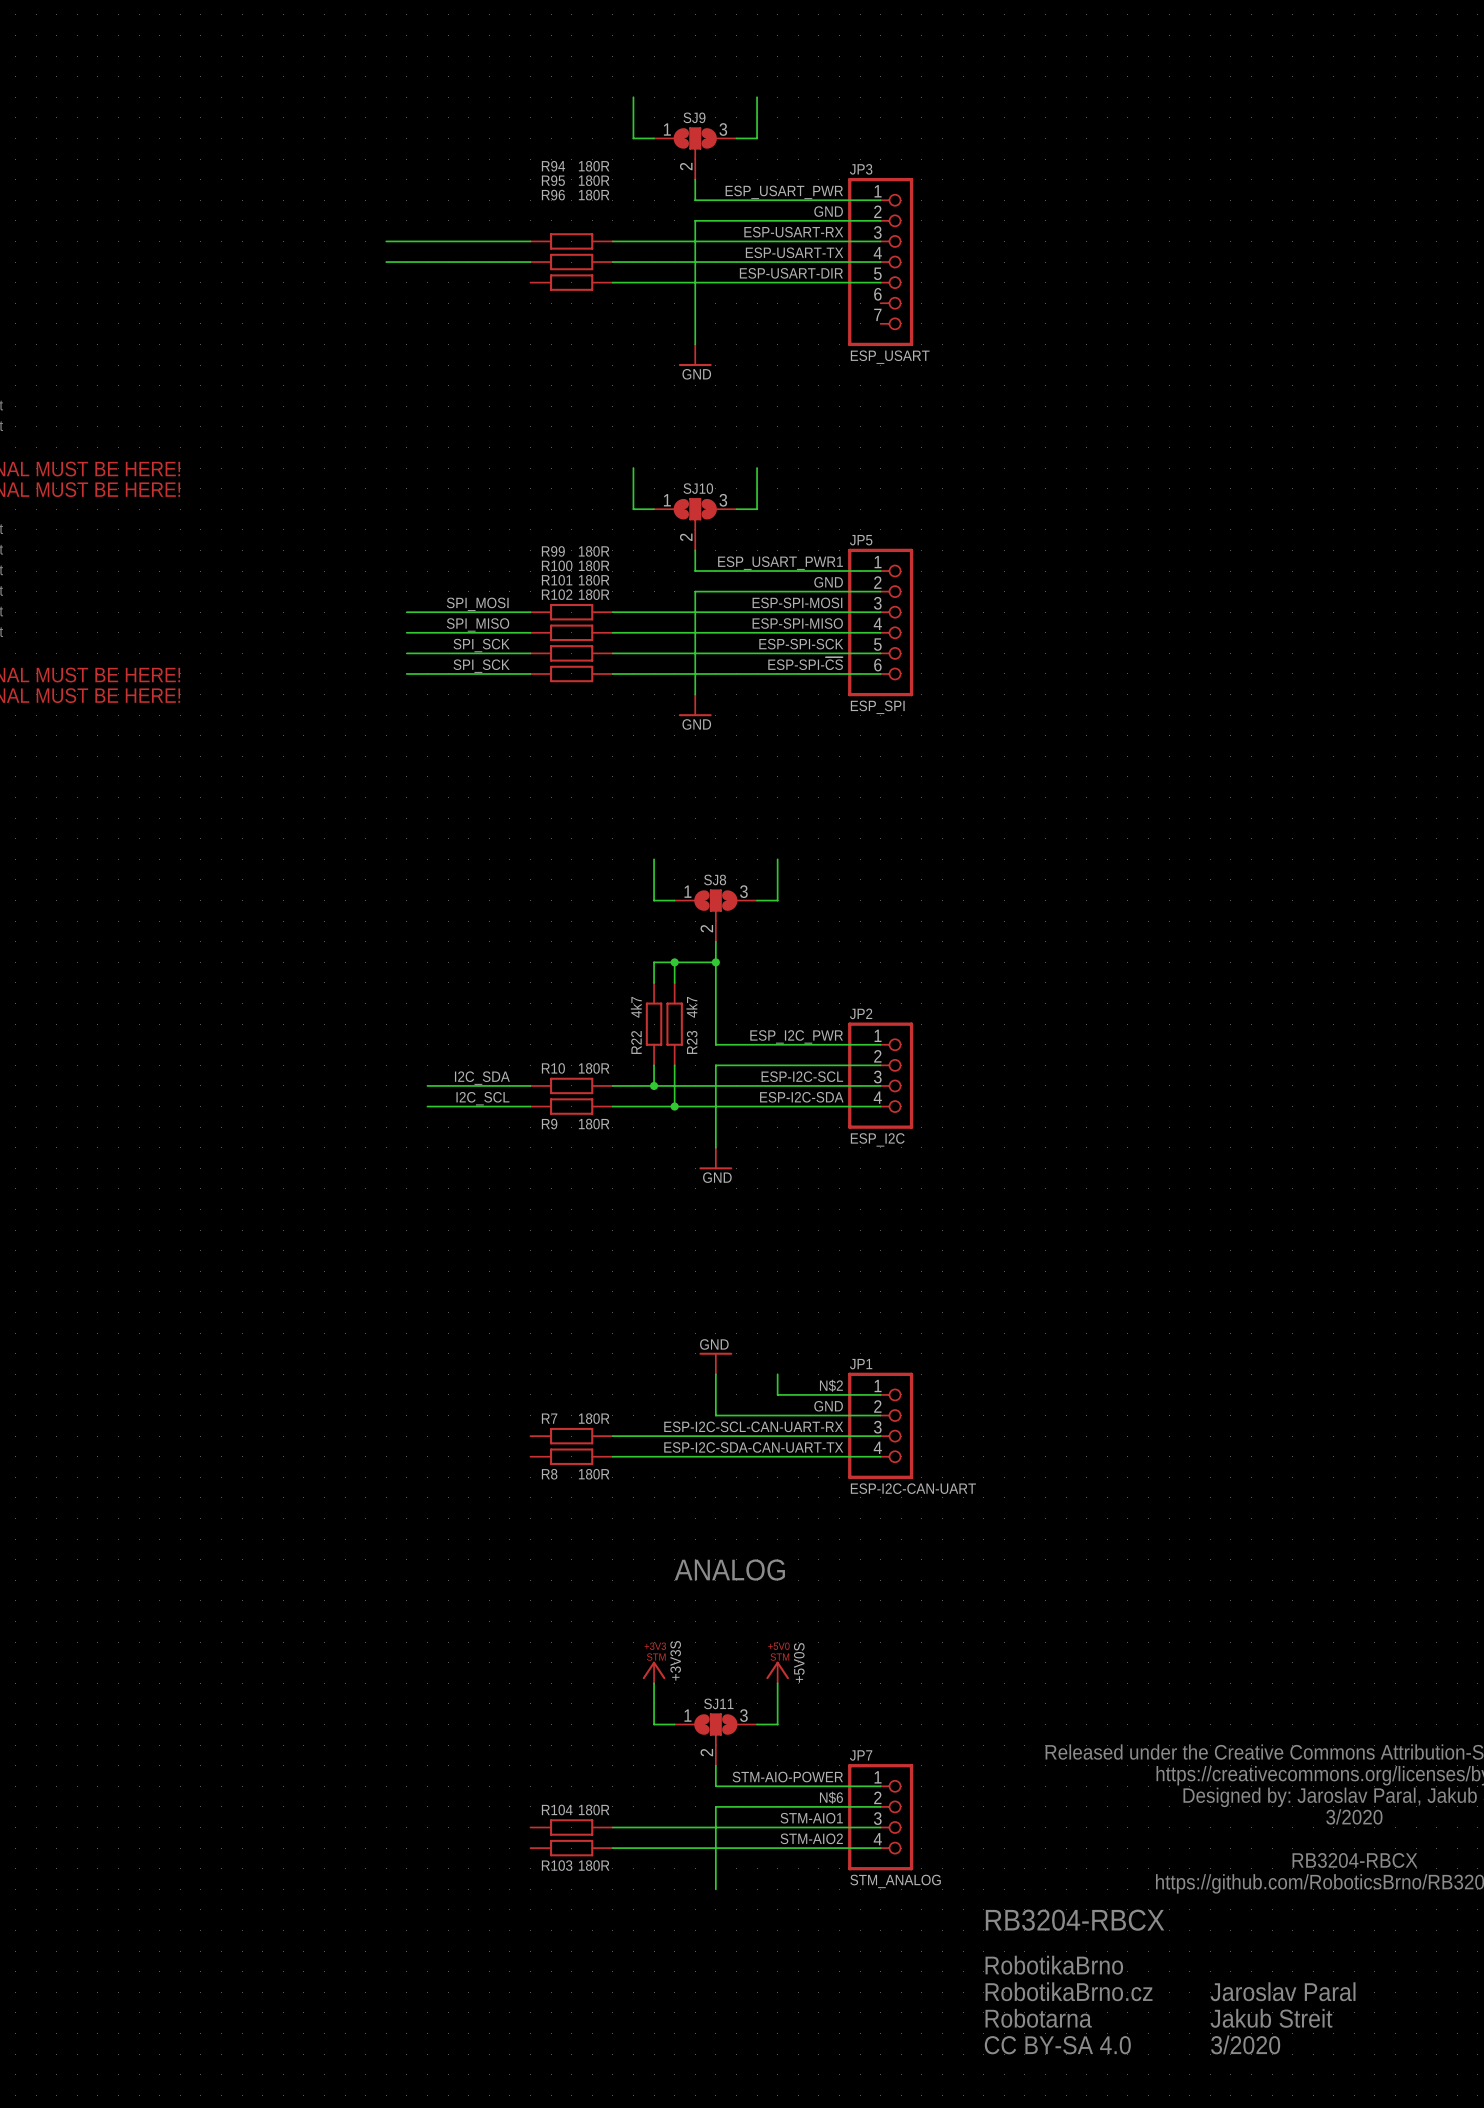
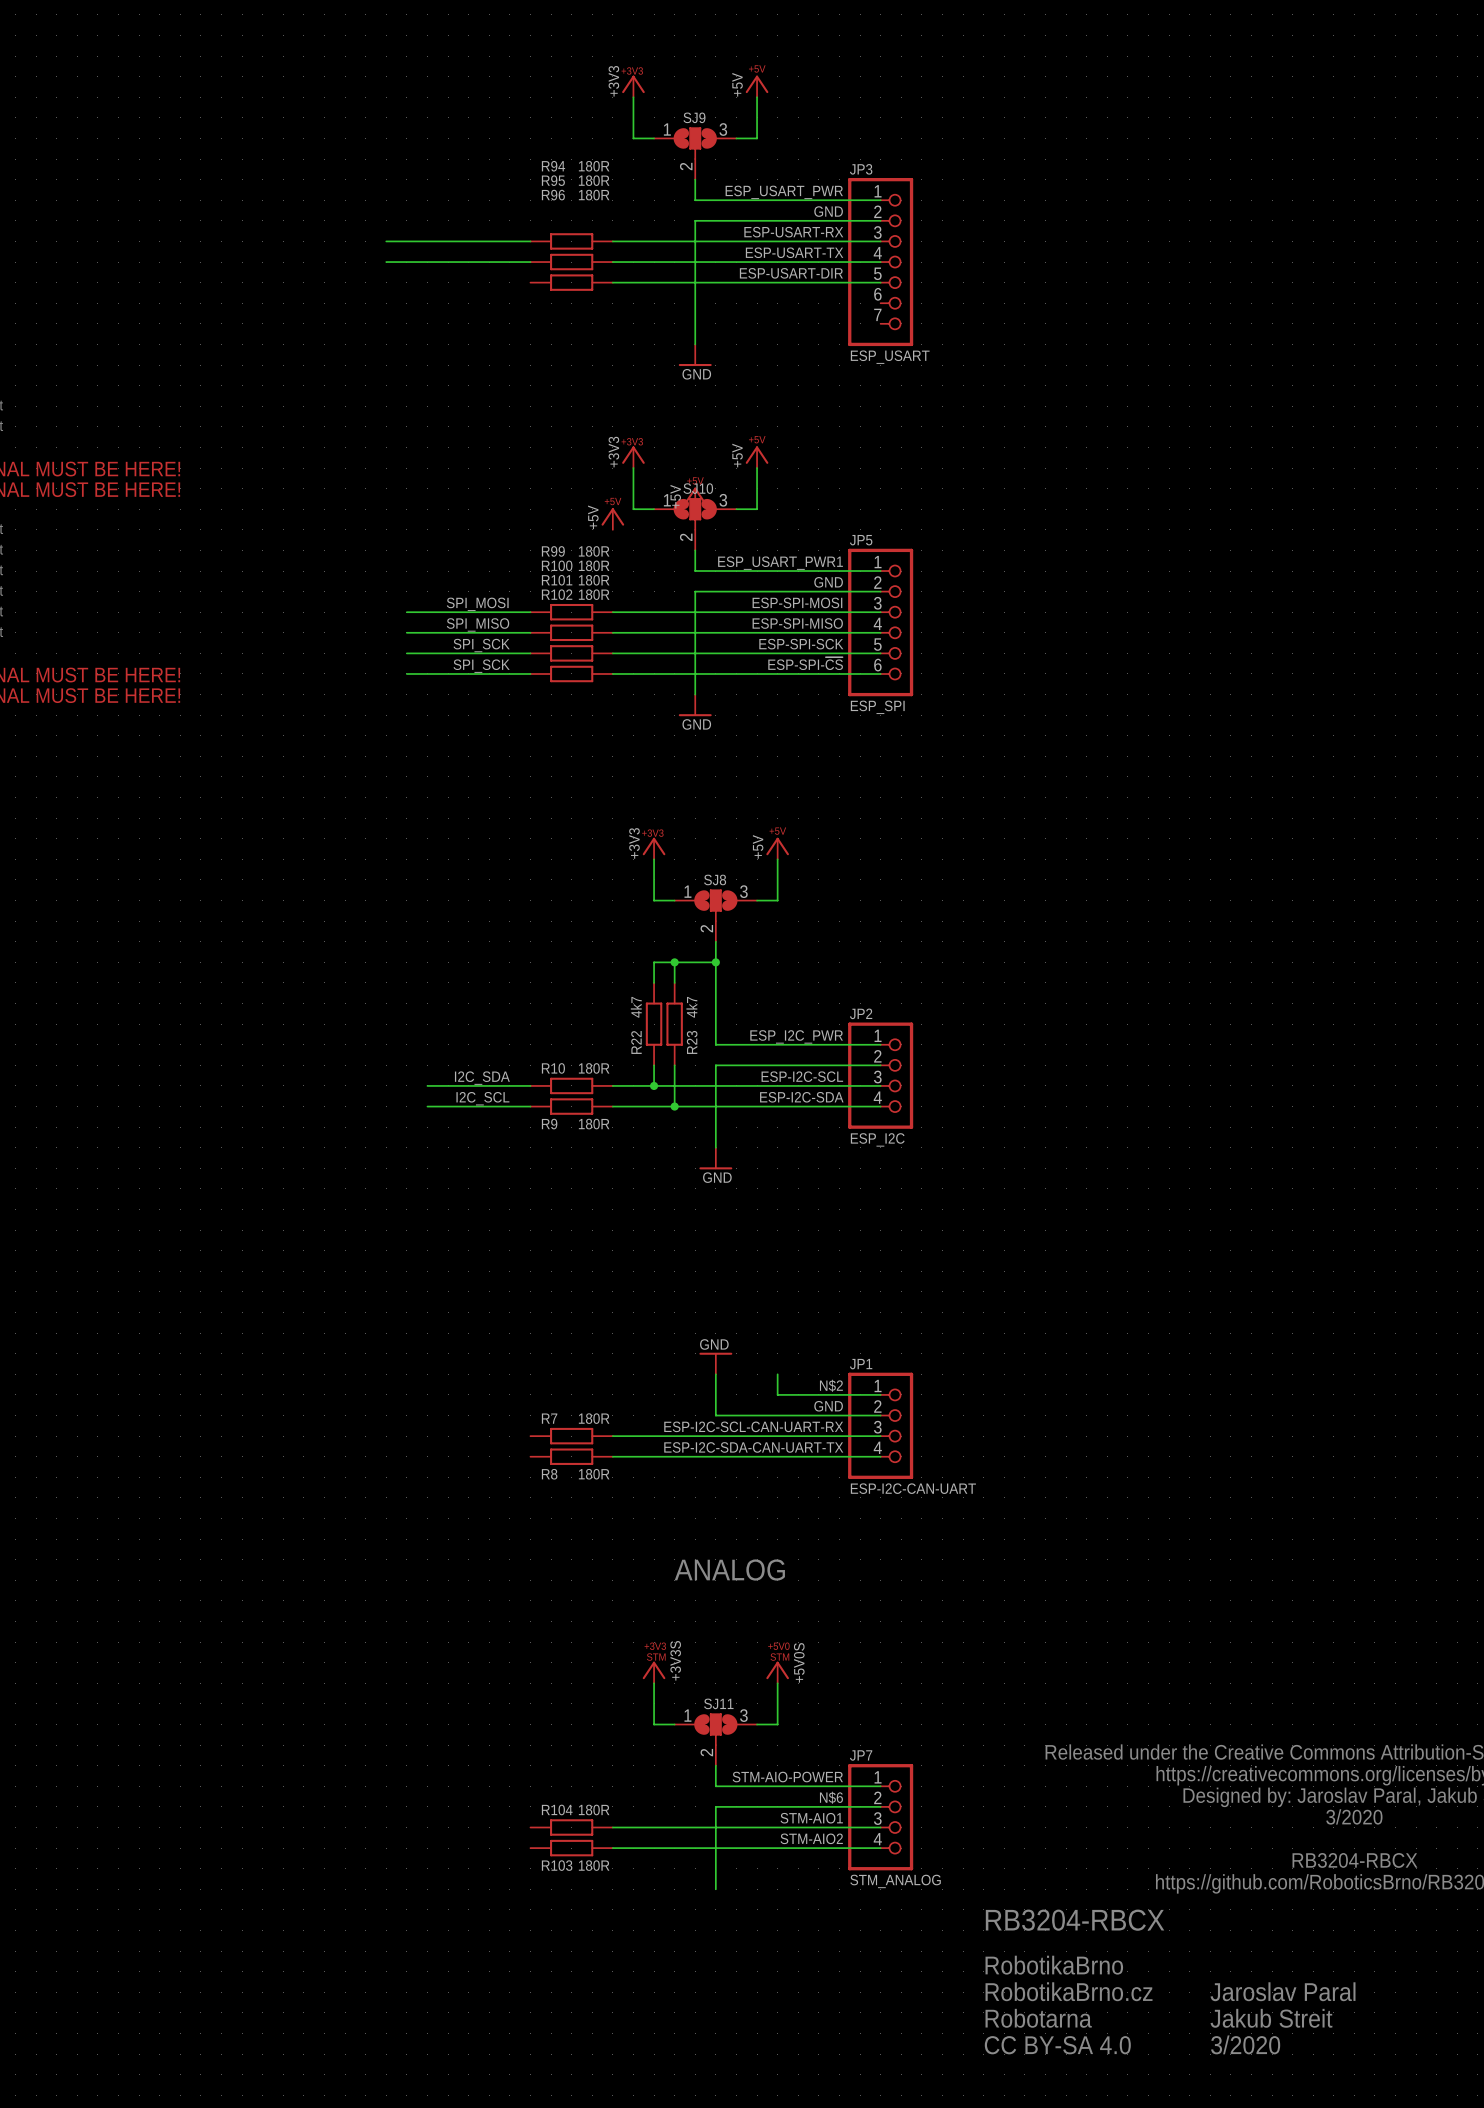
power symbol: none -> +3V3 (633, 86)
power symbol: none -> +5V (757, 86)
power symbol: none -> +3V3 (633, 457)
power symbol: none -> +5V (757, 457)
power symbol: none -> +5V (695, 498)
power symbol: none -> +5V (612, 518)
power symbol: none -> +3V3 (654, 848)
power symbol: none -> +5V (777, 848)

